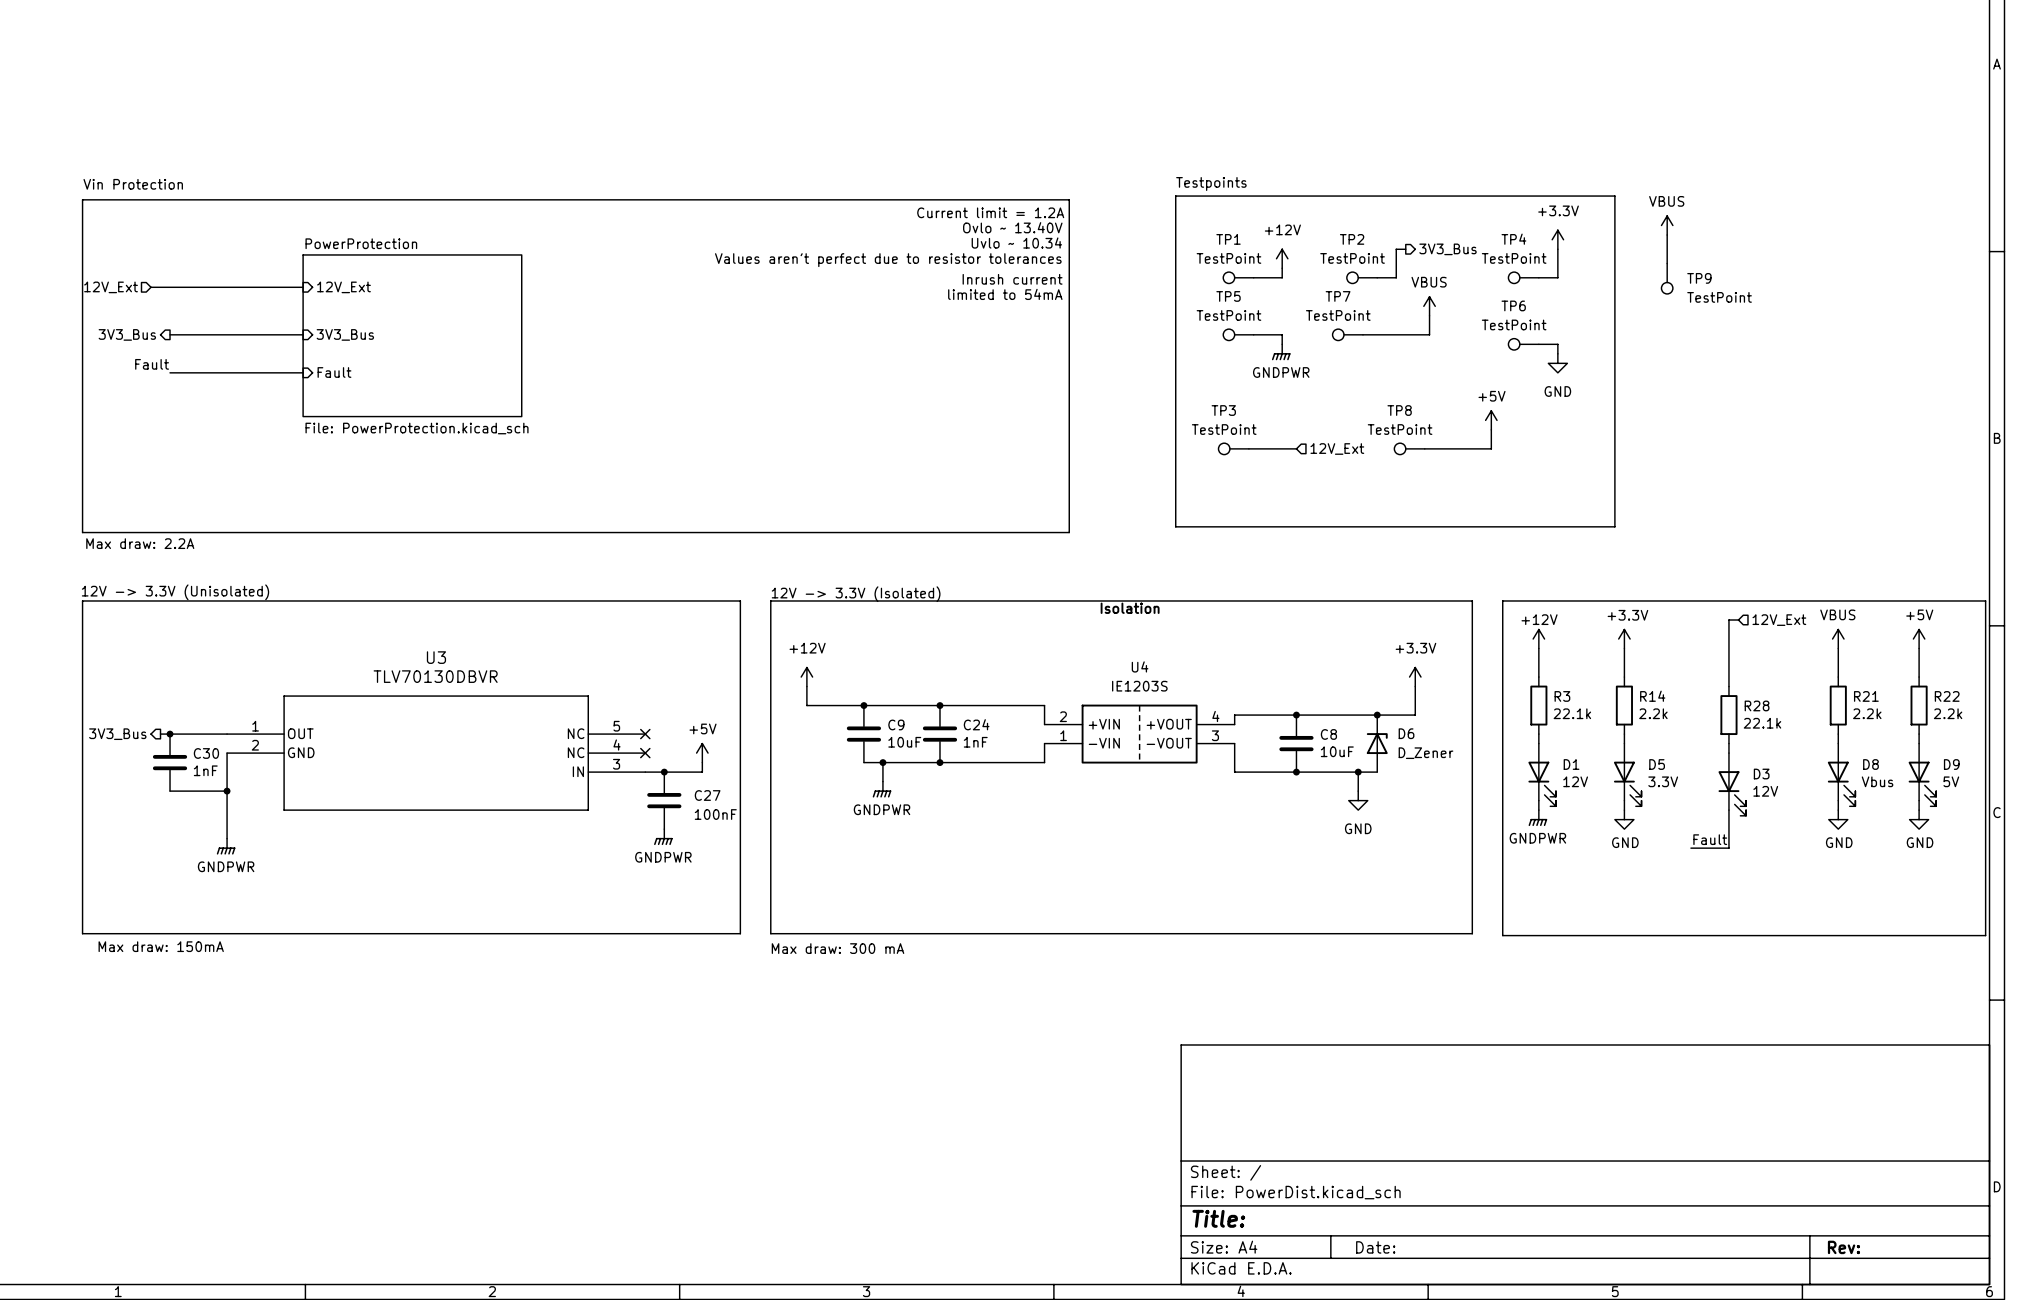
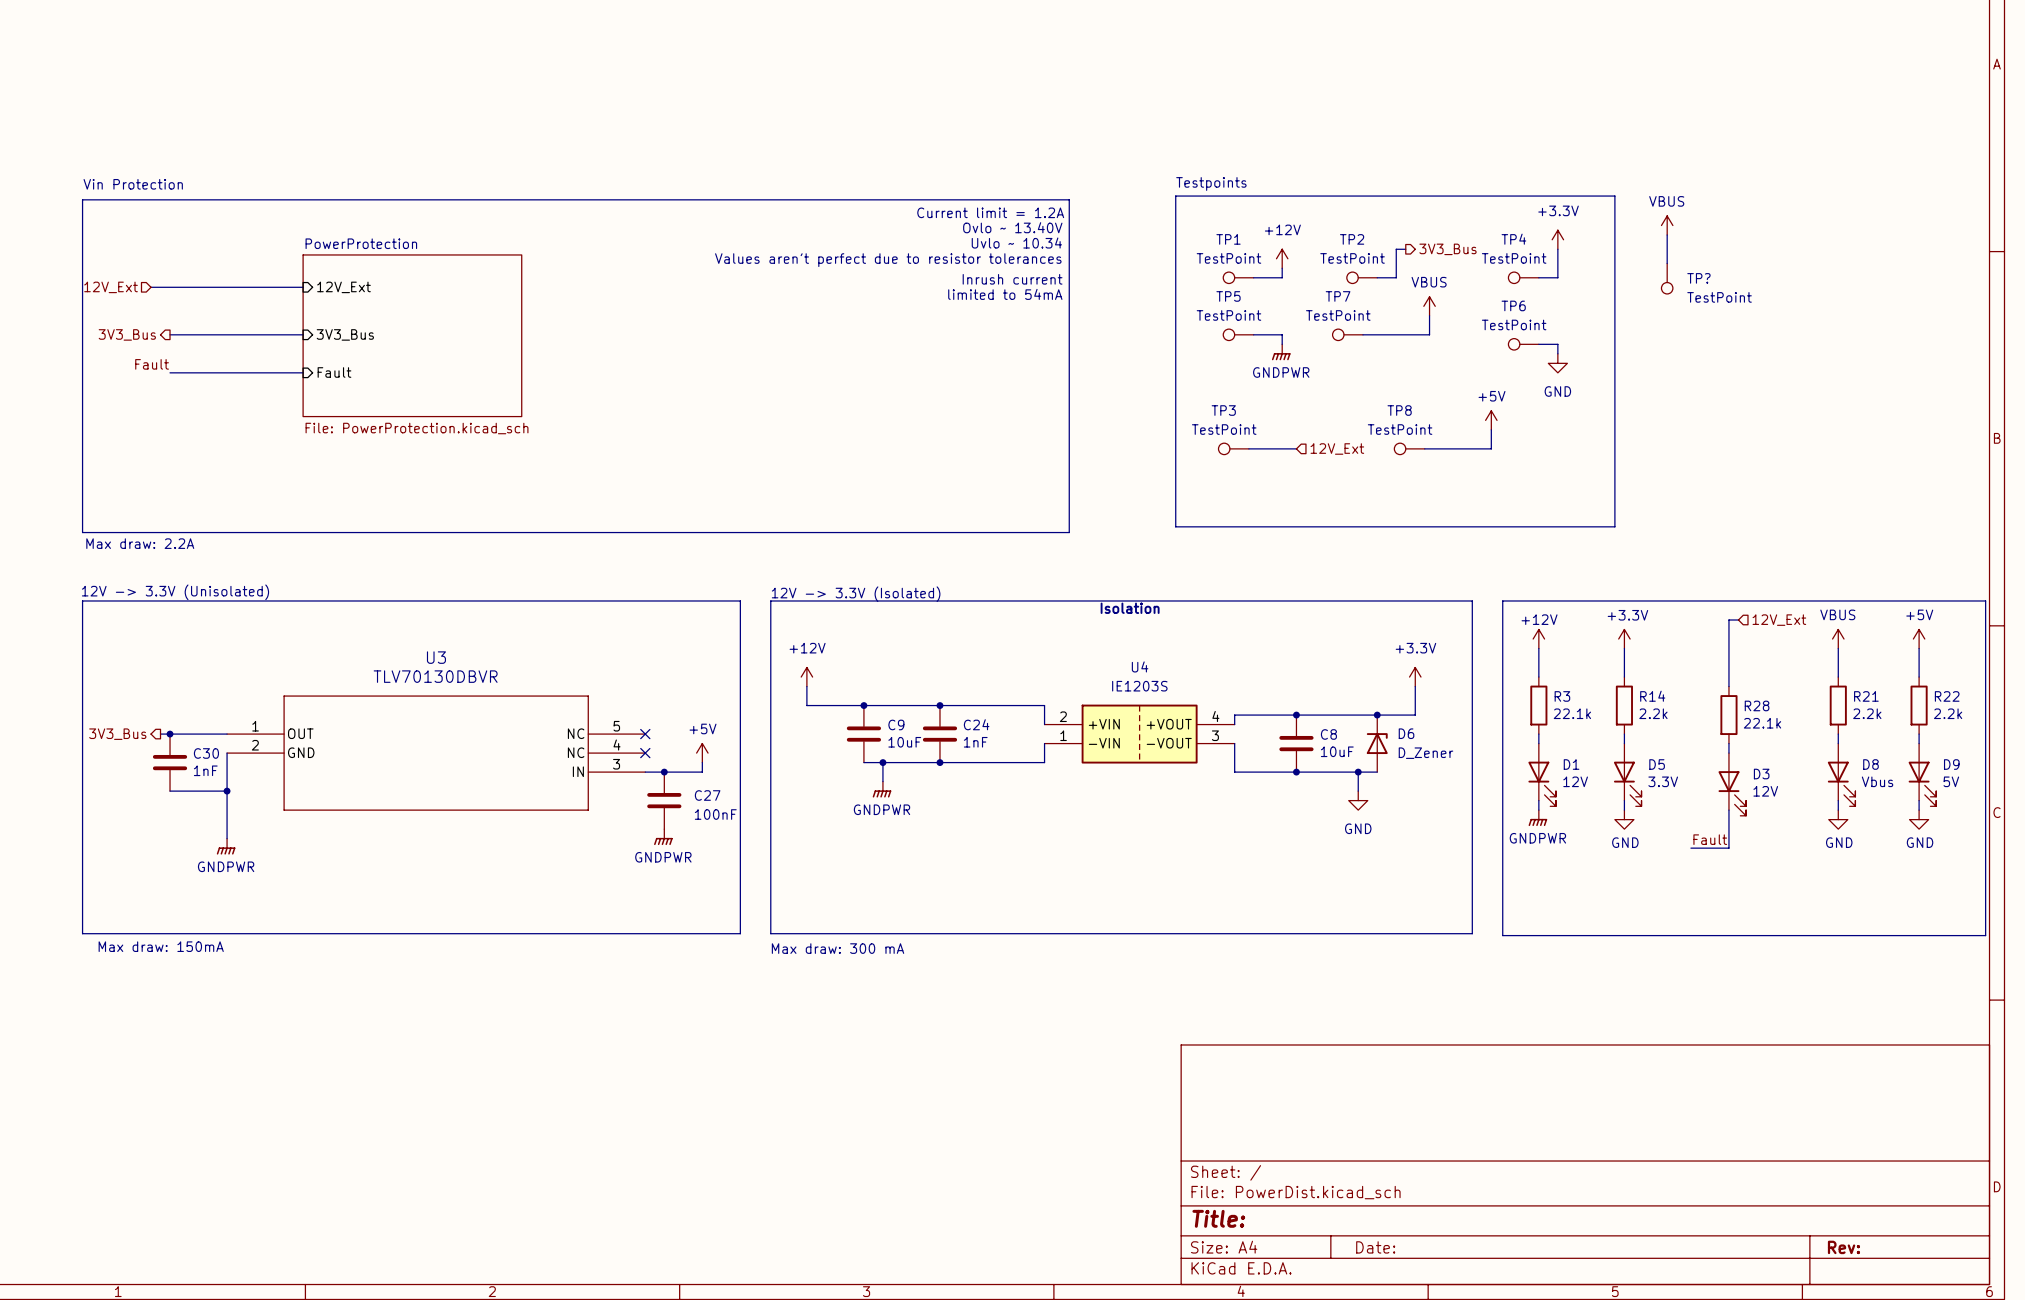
TP9 name: TP9 (1699, 278) -> TP? (1698, 278)

